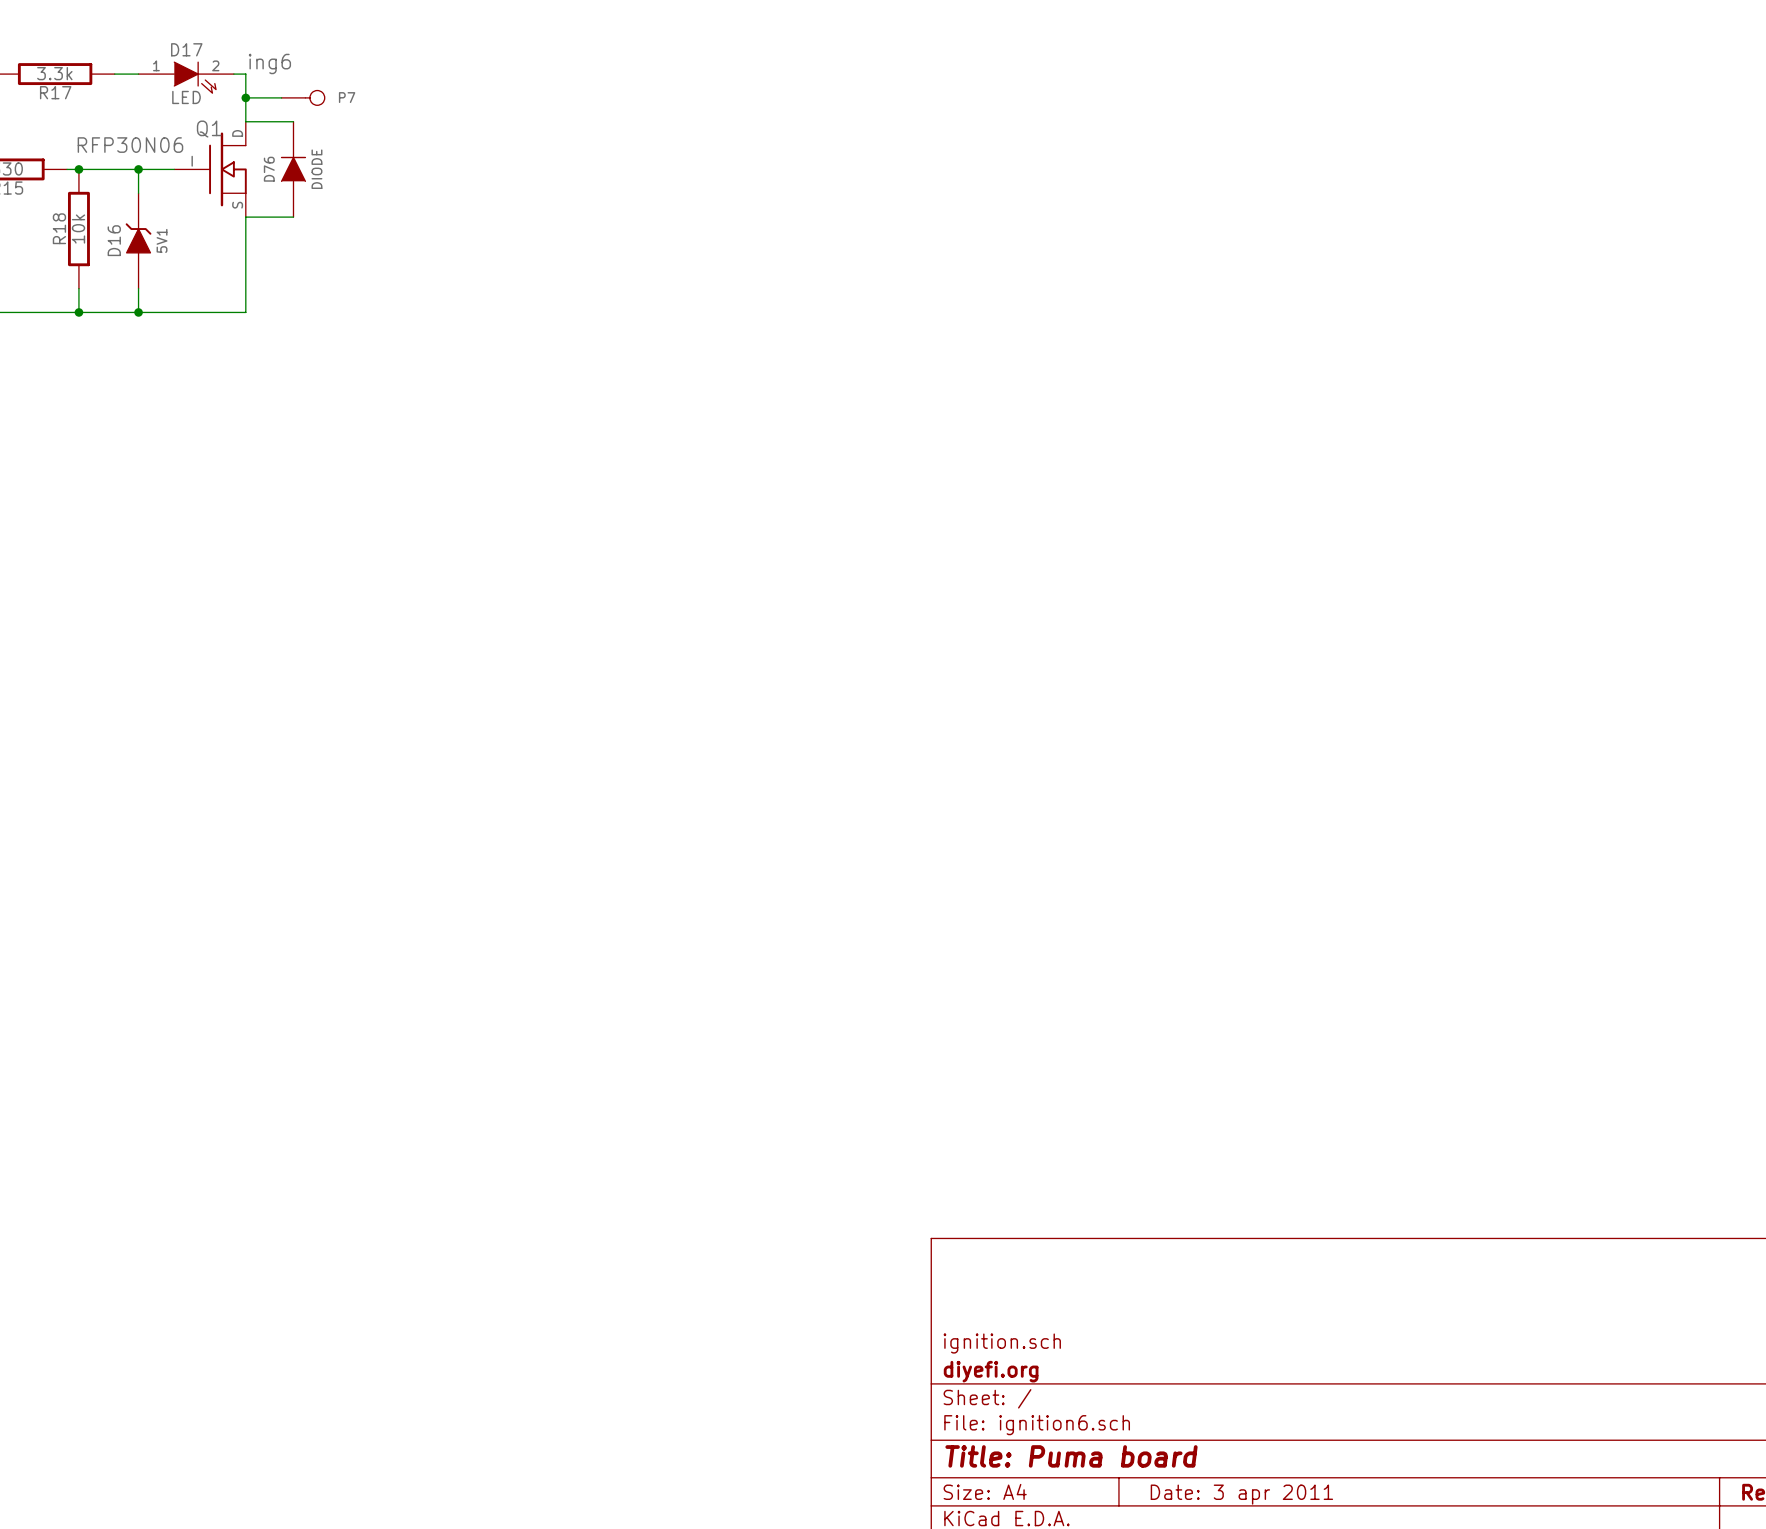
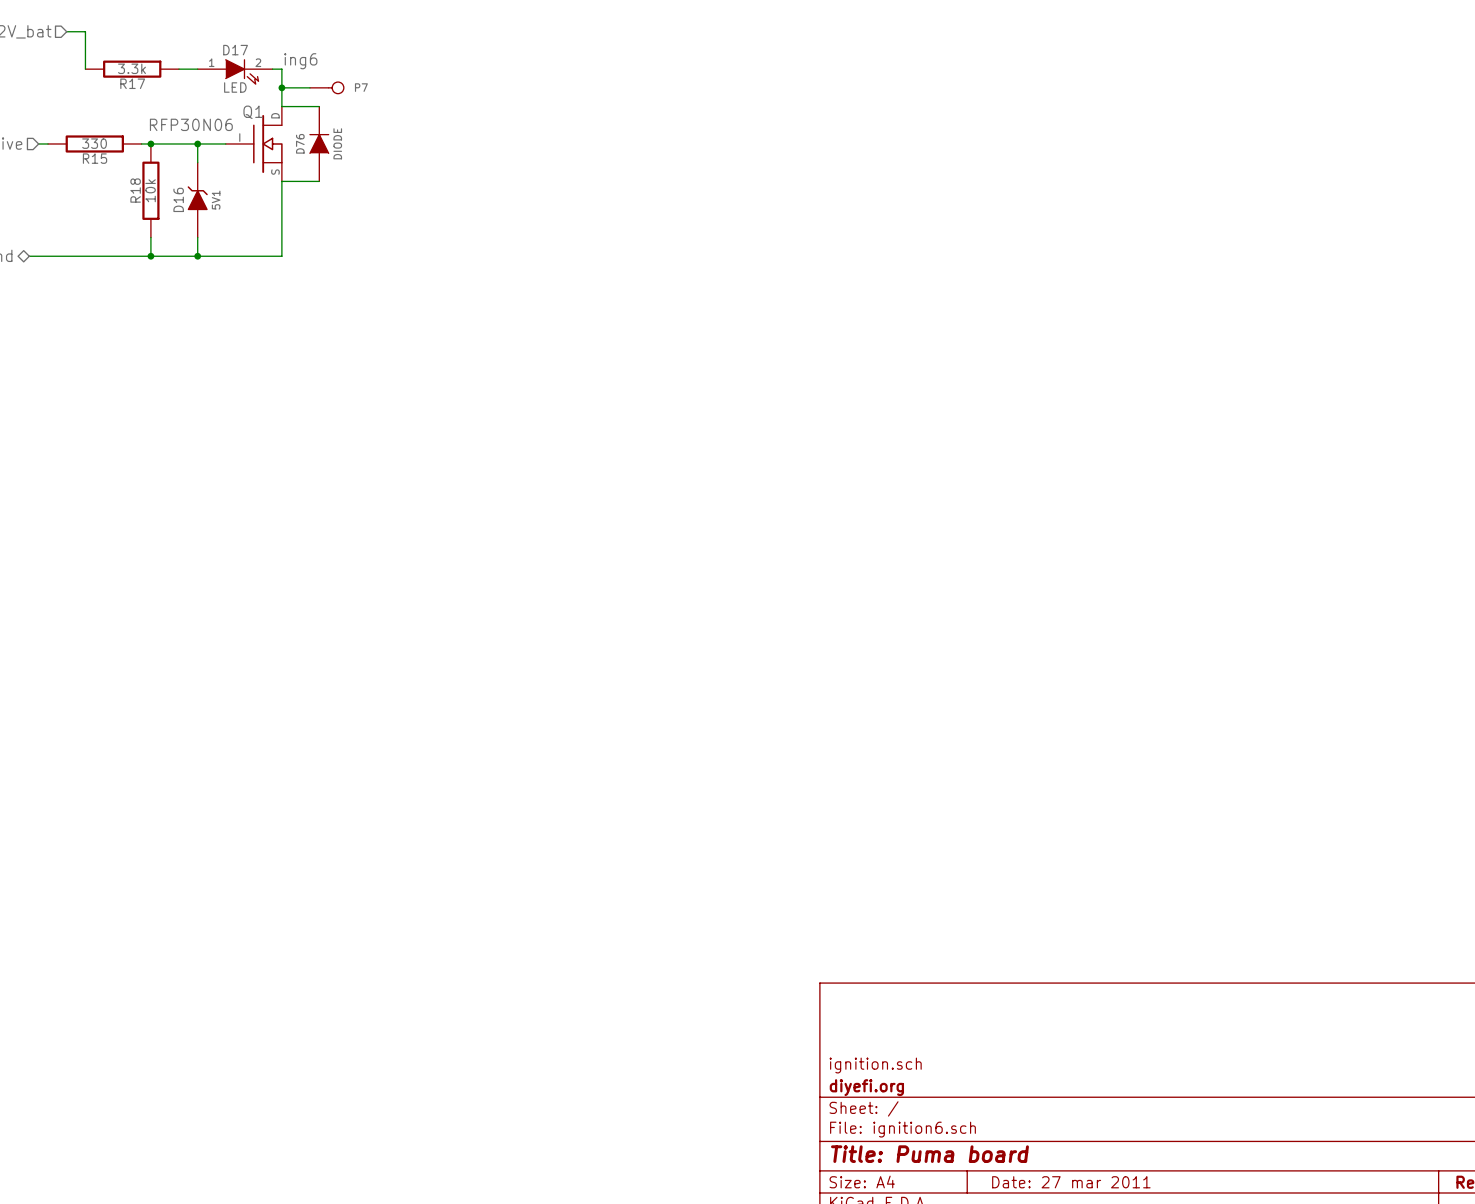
title block: Date: 3 apr 2011 (1241, 1494) -> Date: 27 mar 2011 (1071, 1182)

